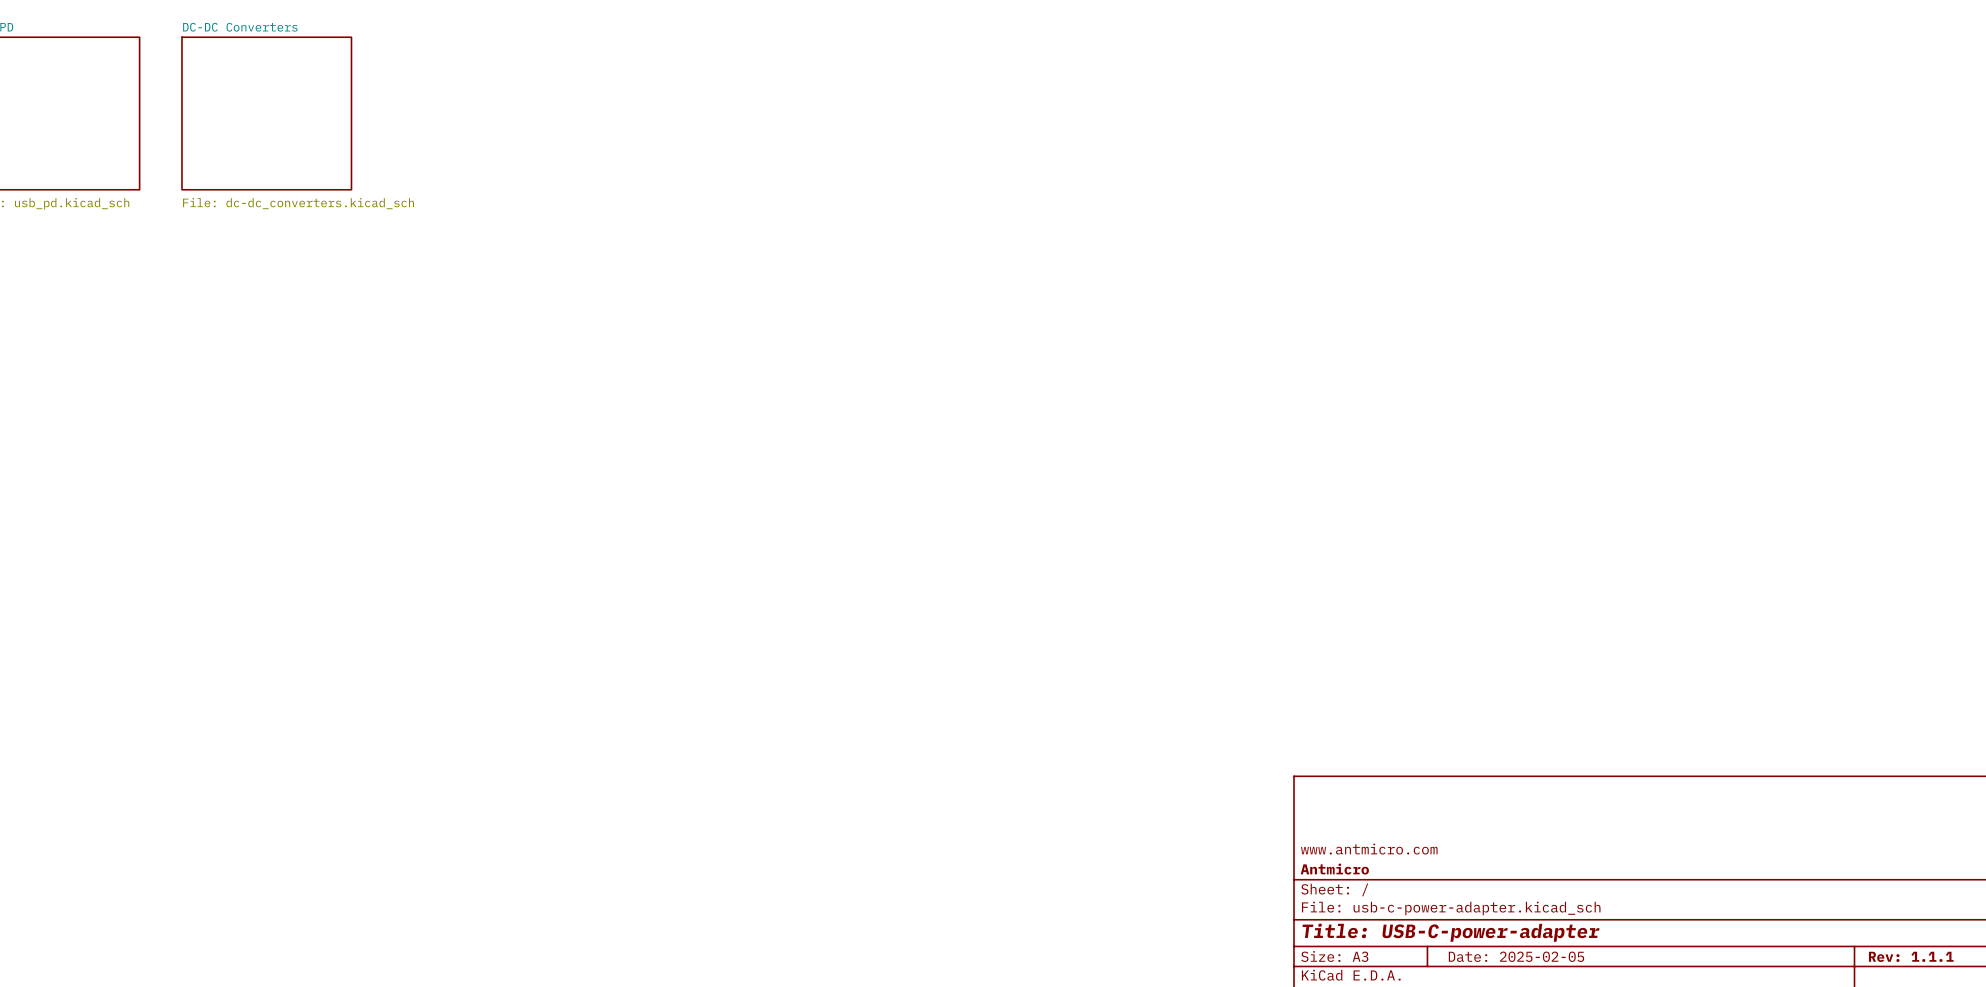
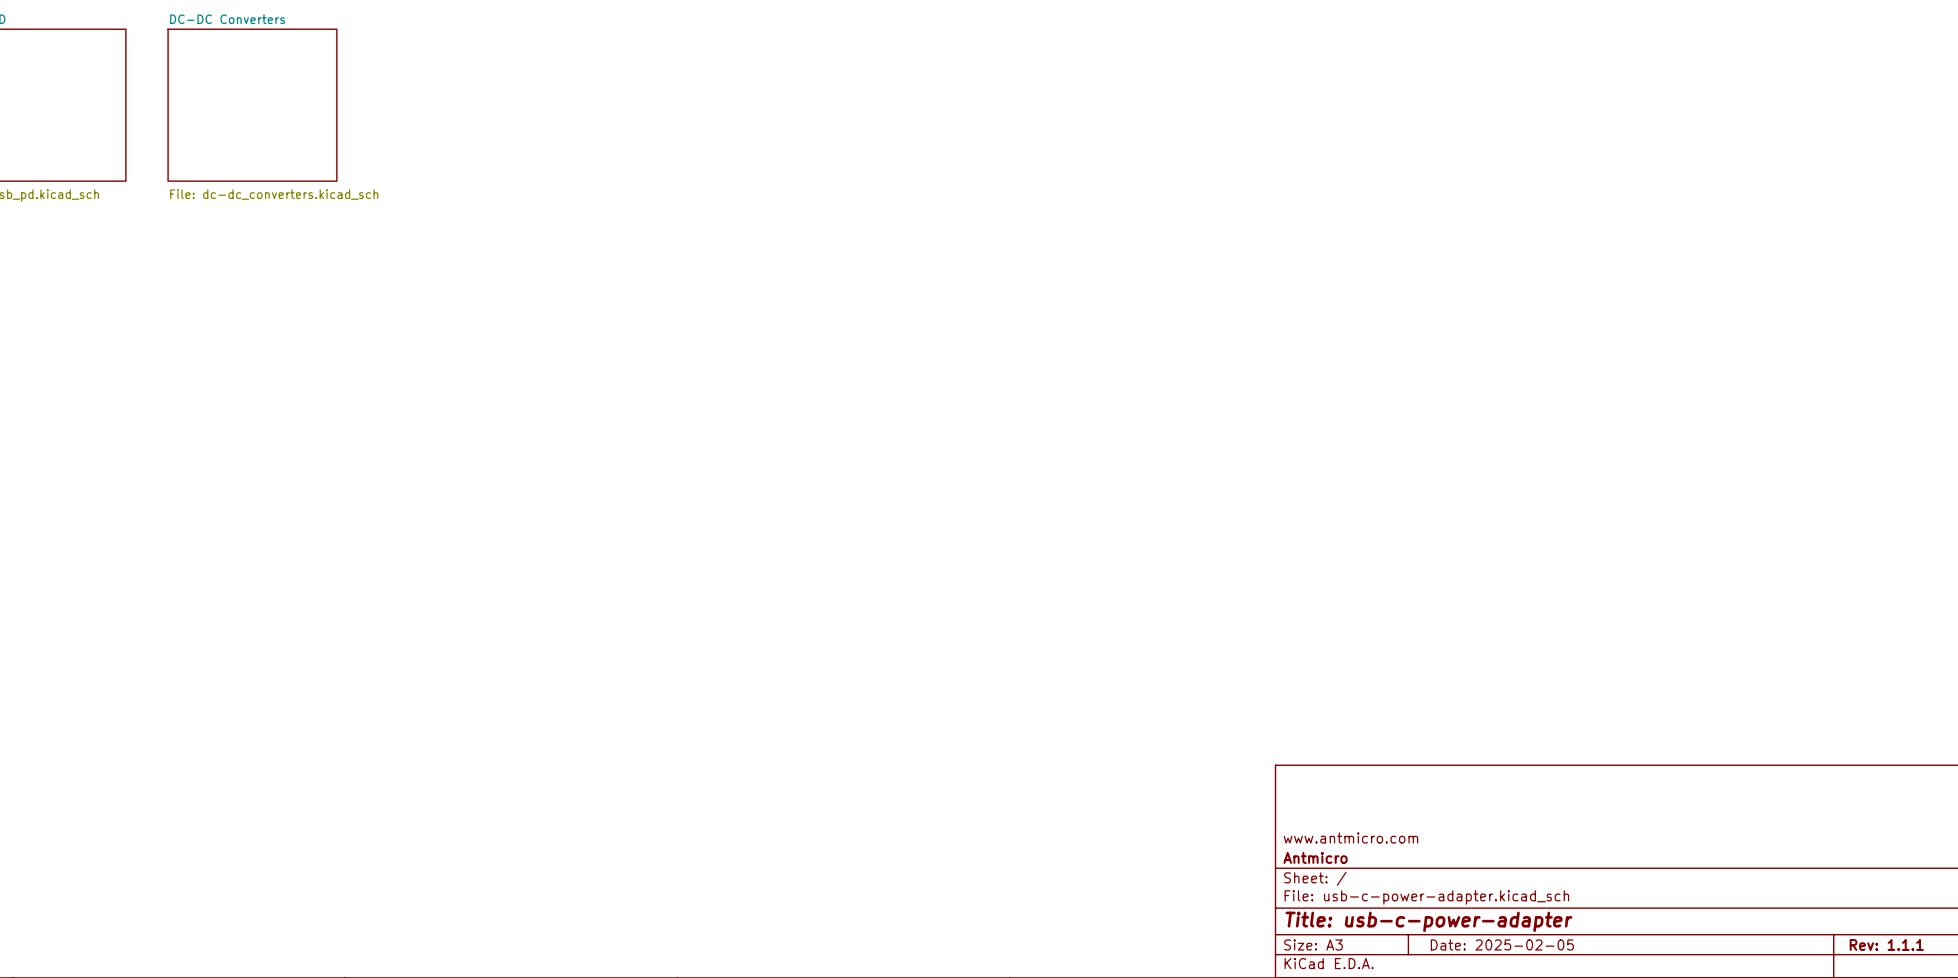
title block: Title: USB-C-power-adapter (1450, 932) -> Title: usb-c-power-adapter (1428, 921)

